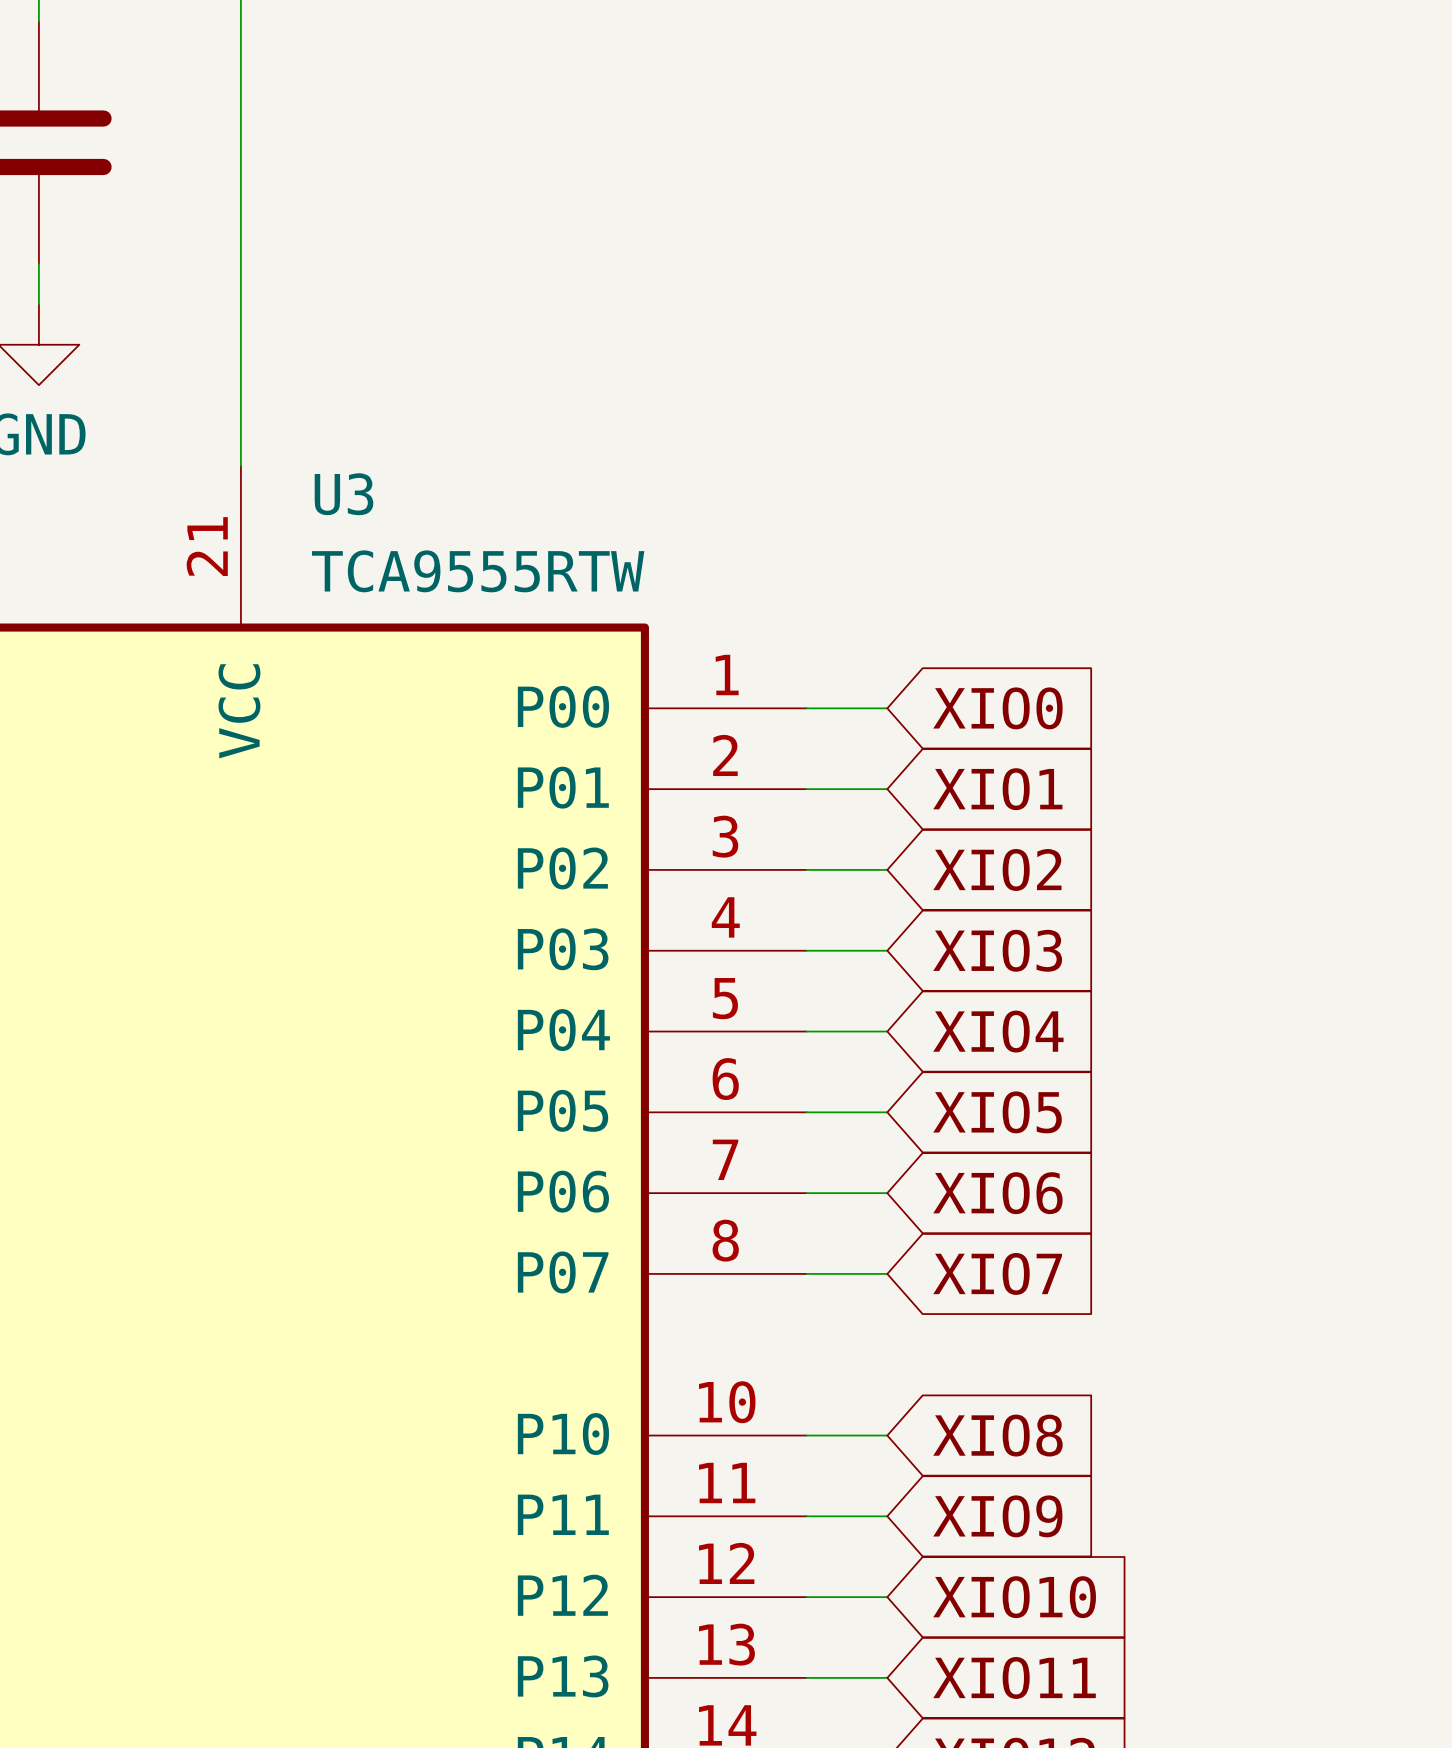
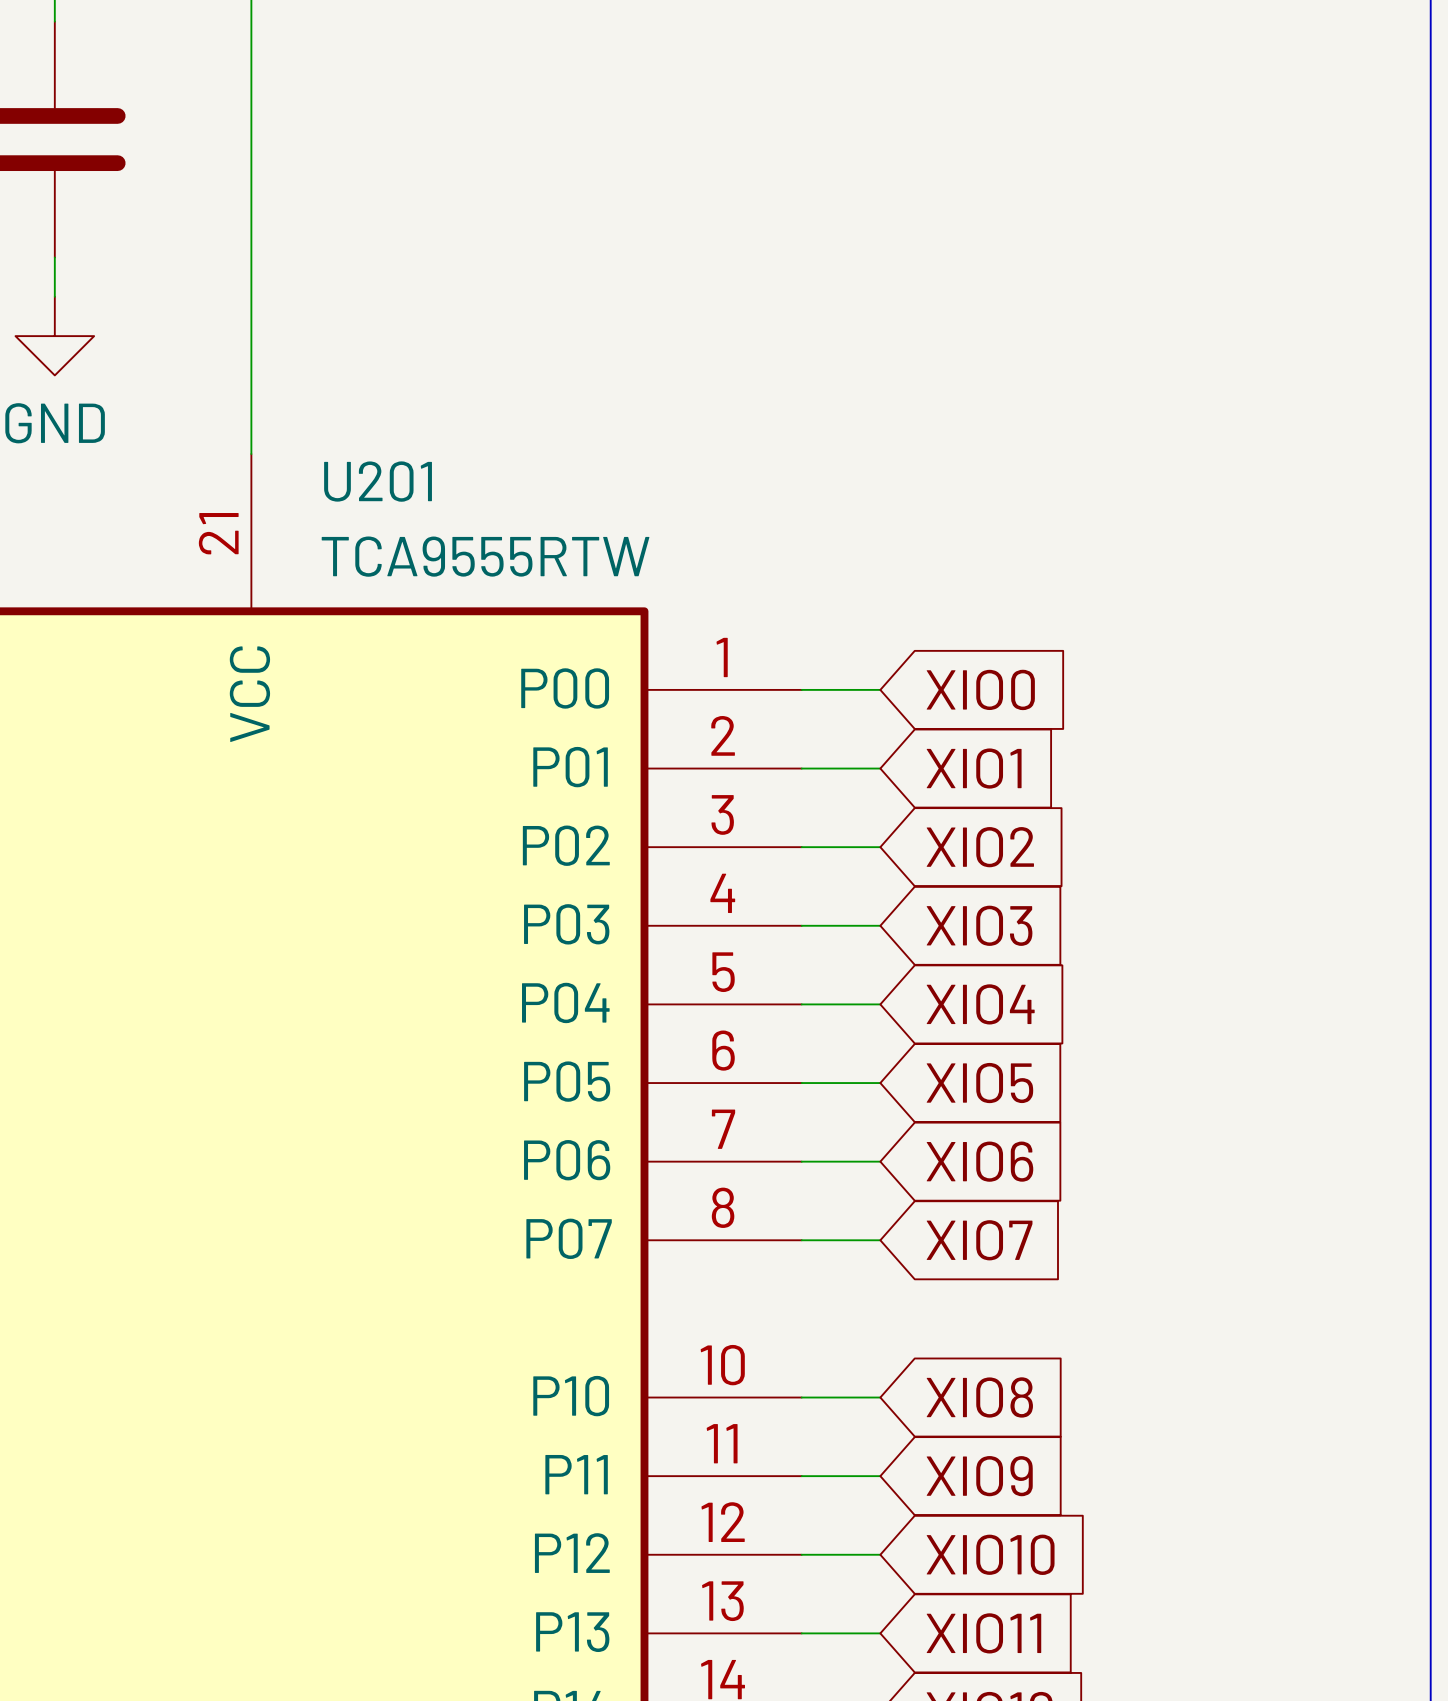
U3 name: U3 (343, 494) -> U201 (378, 481)

